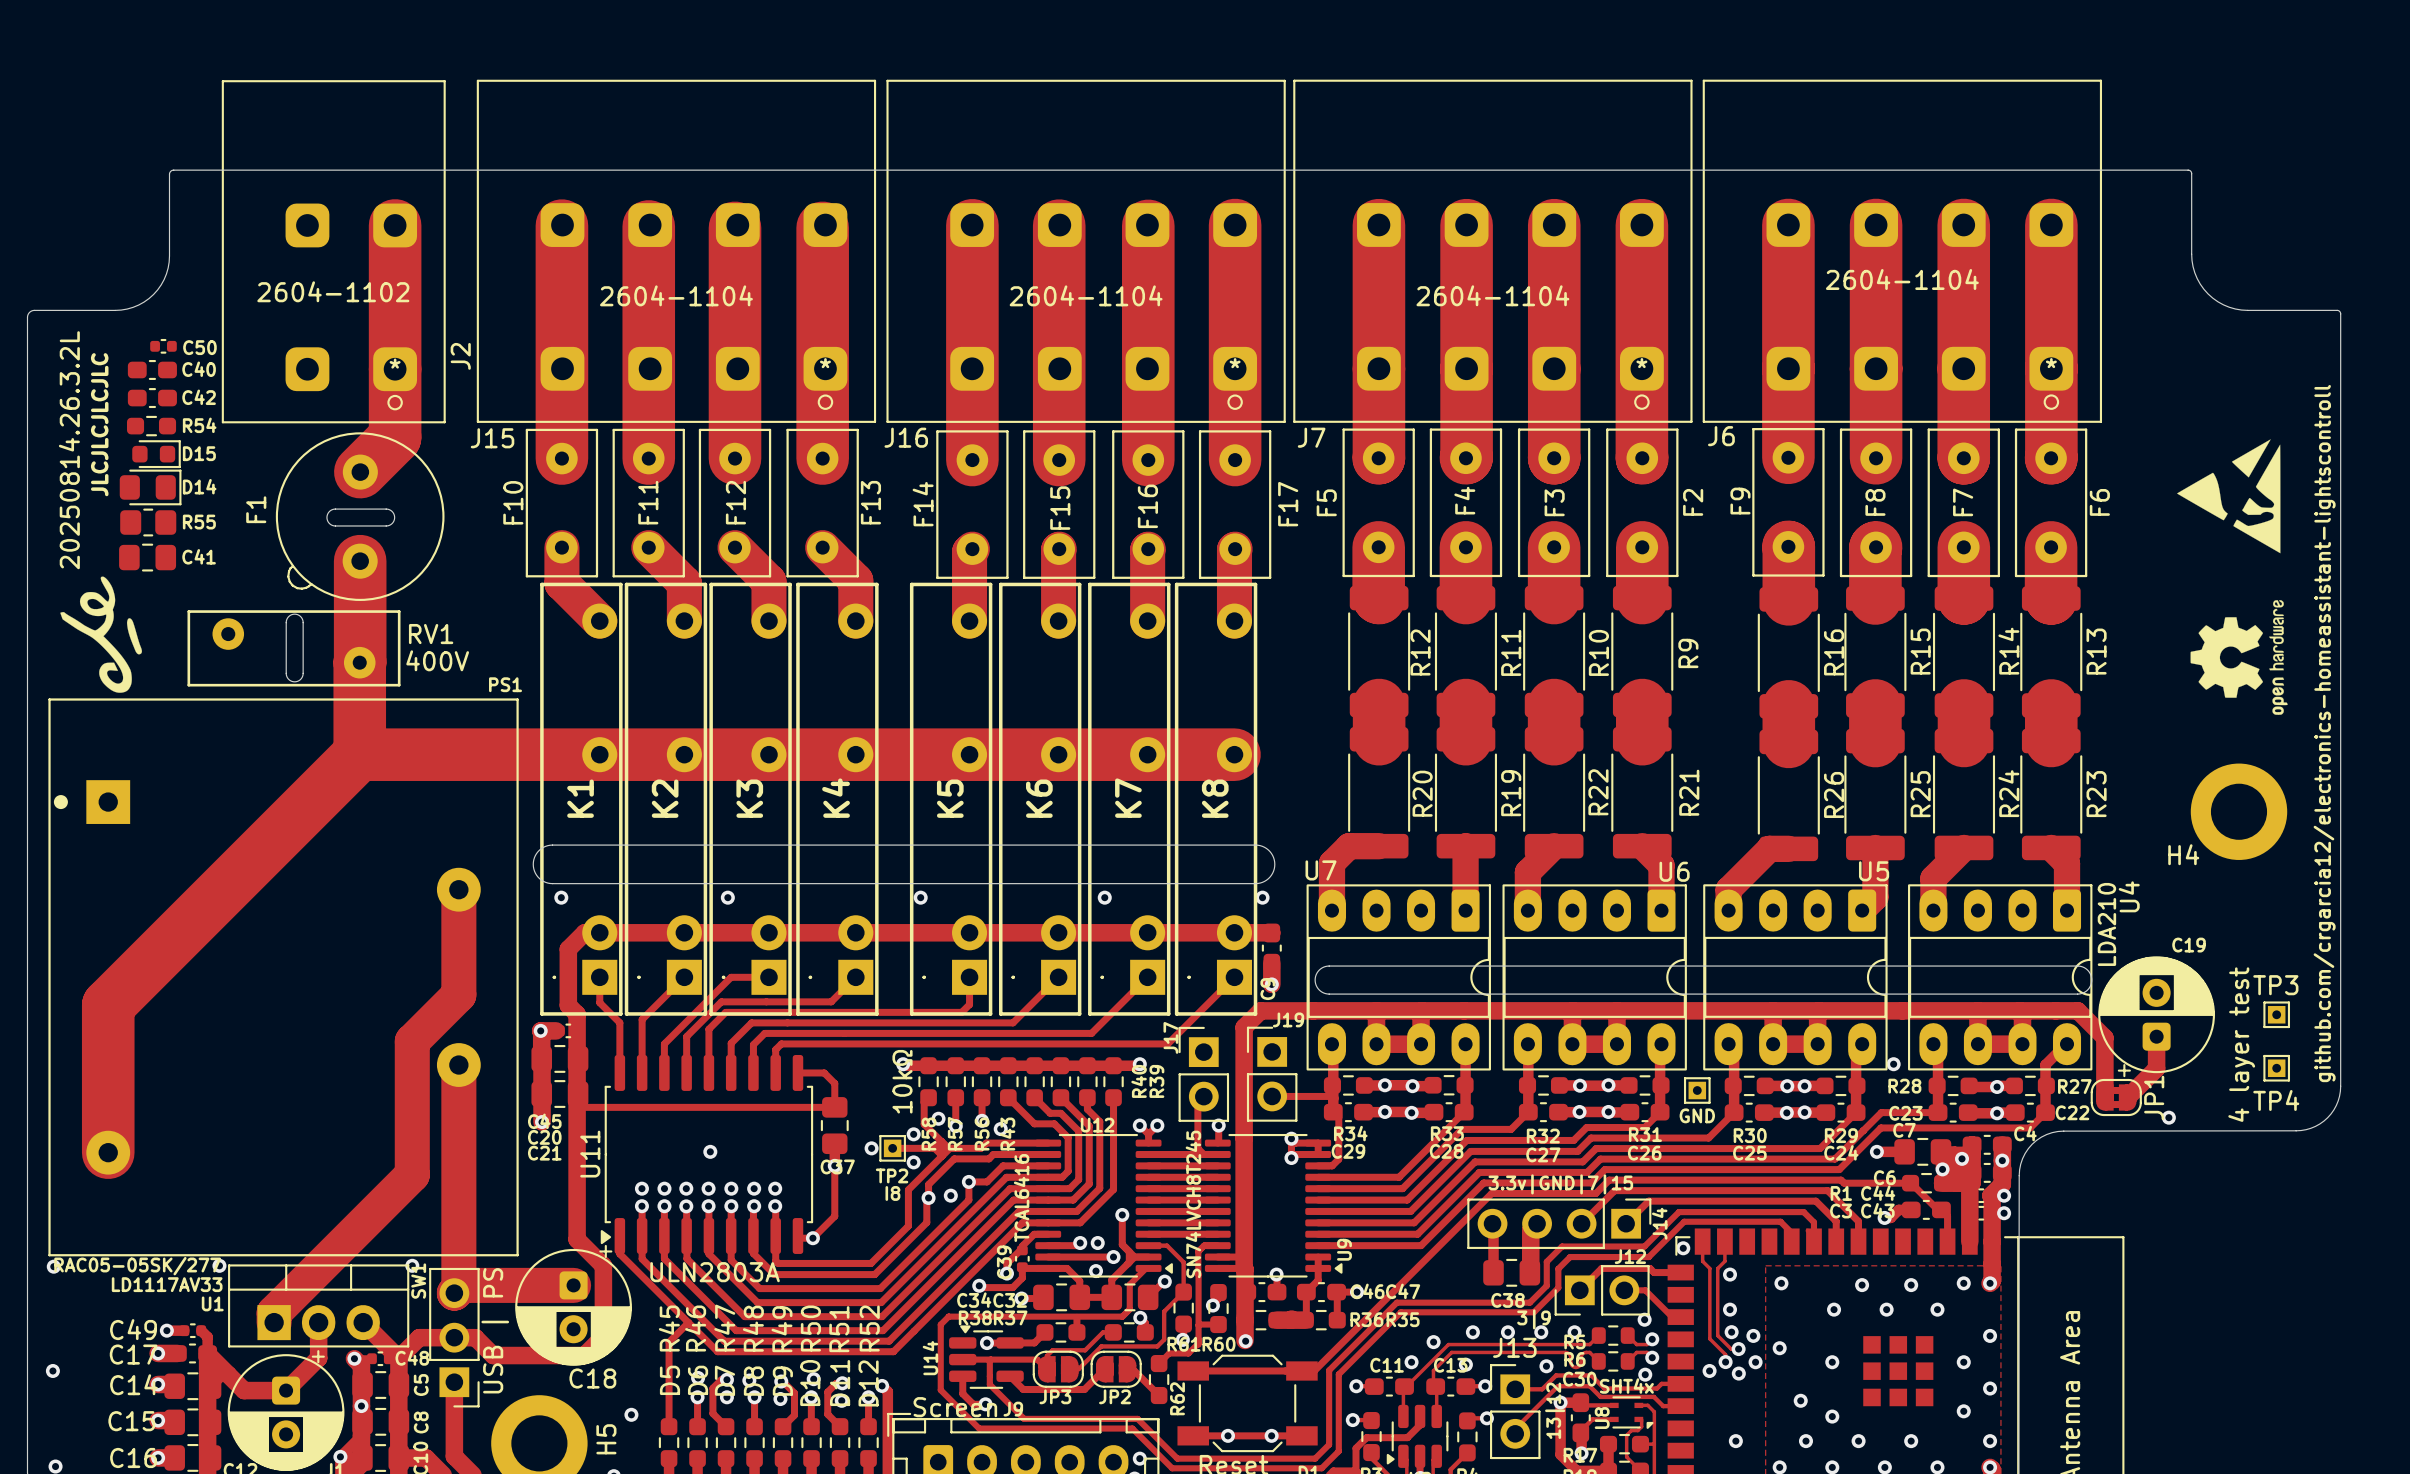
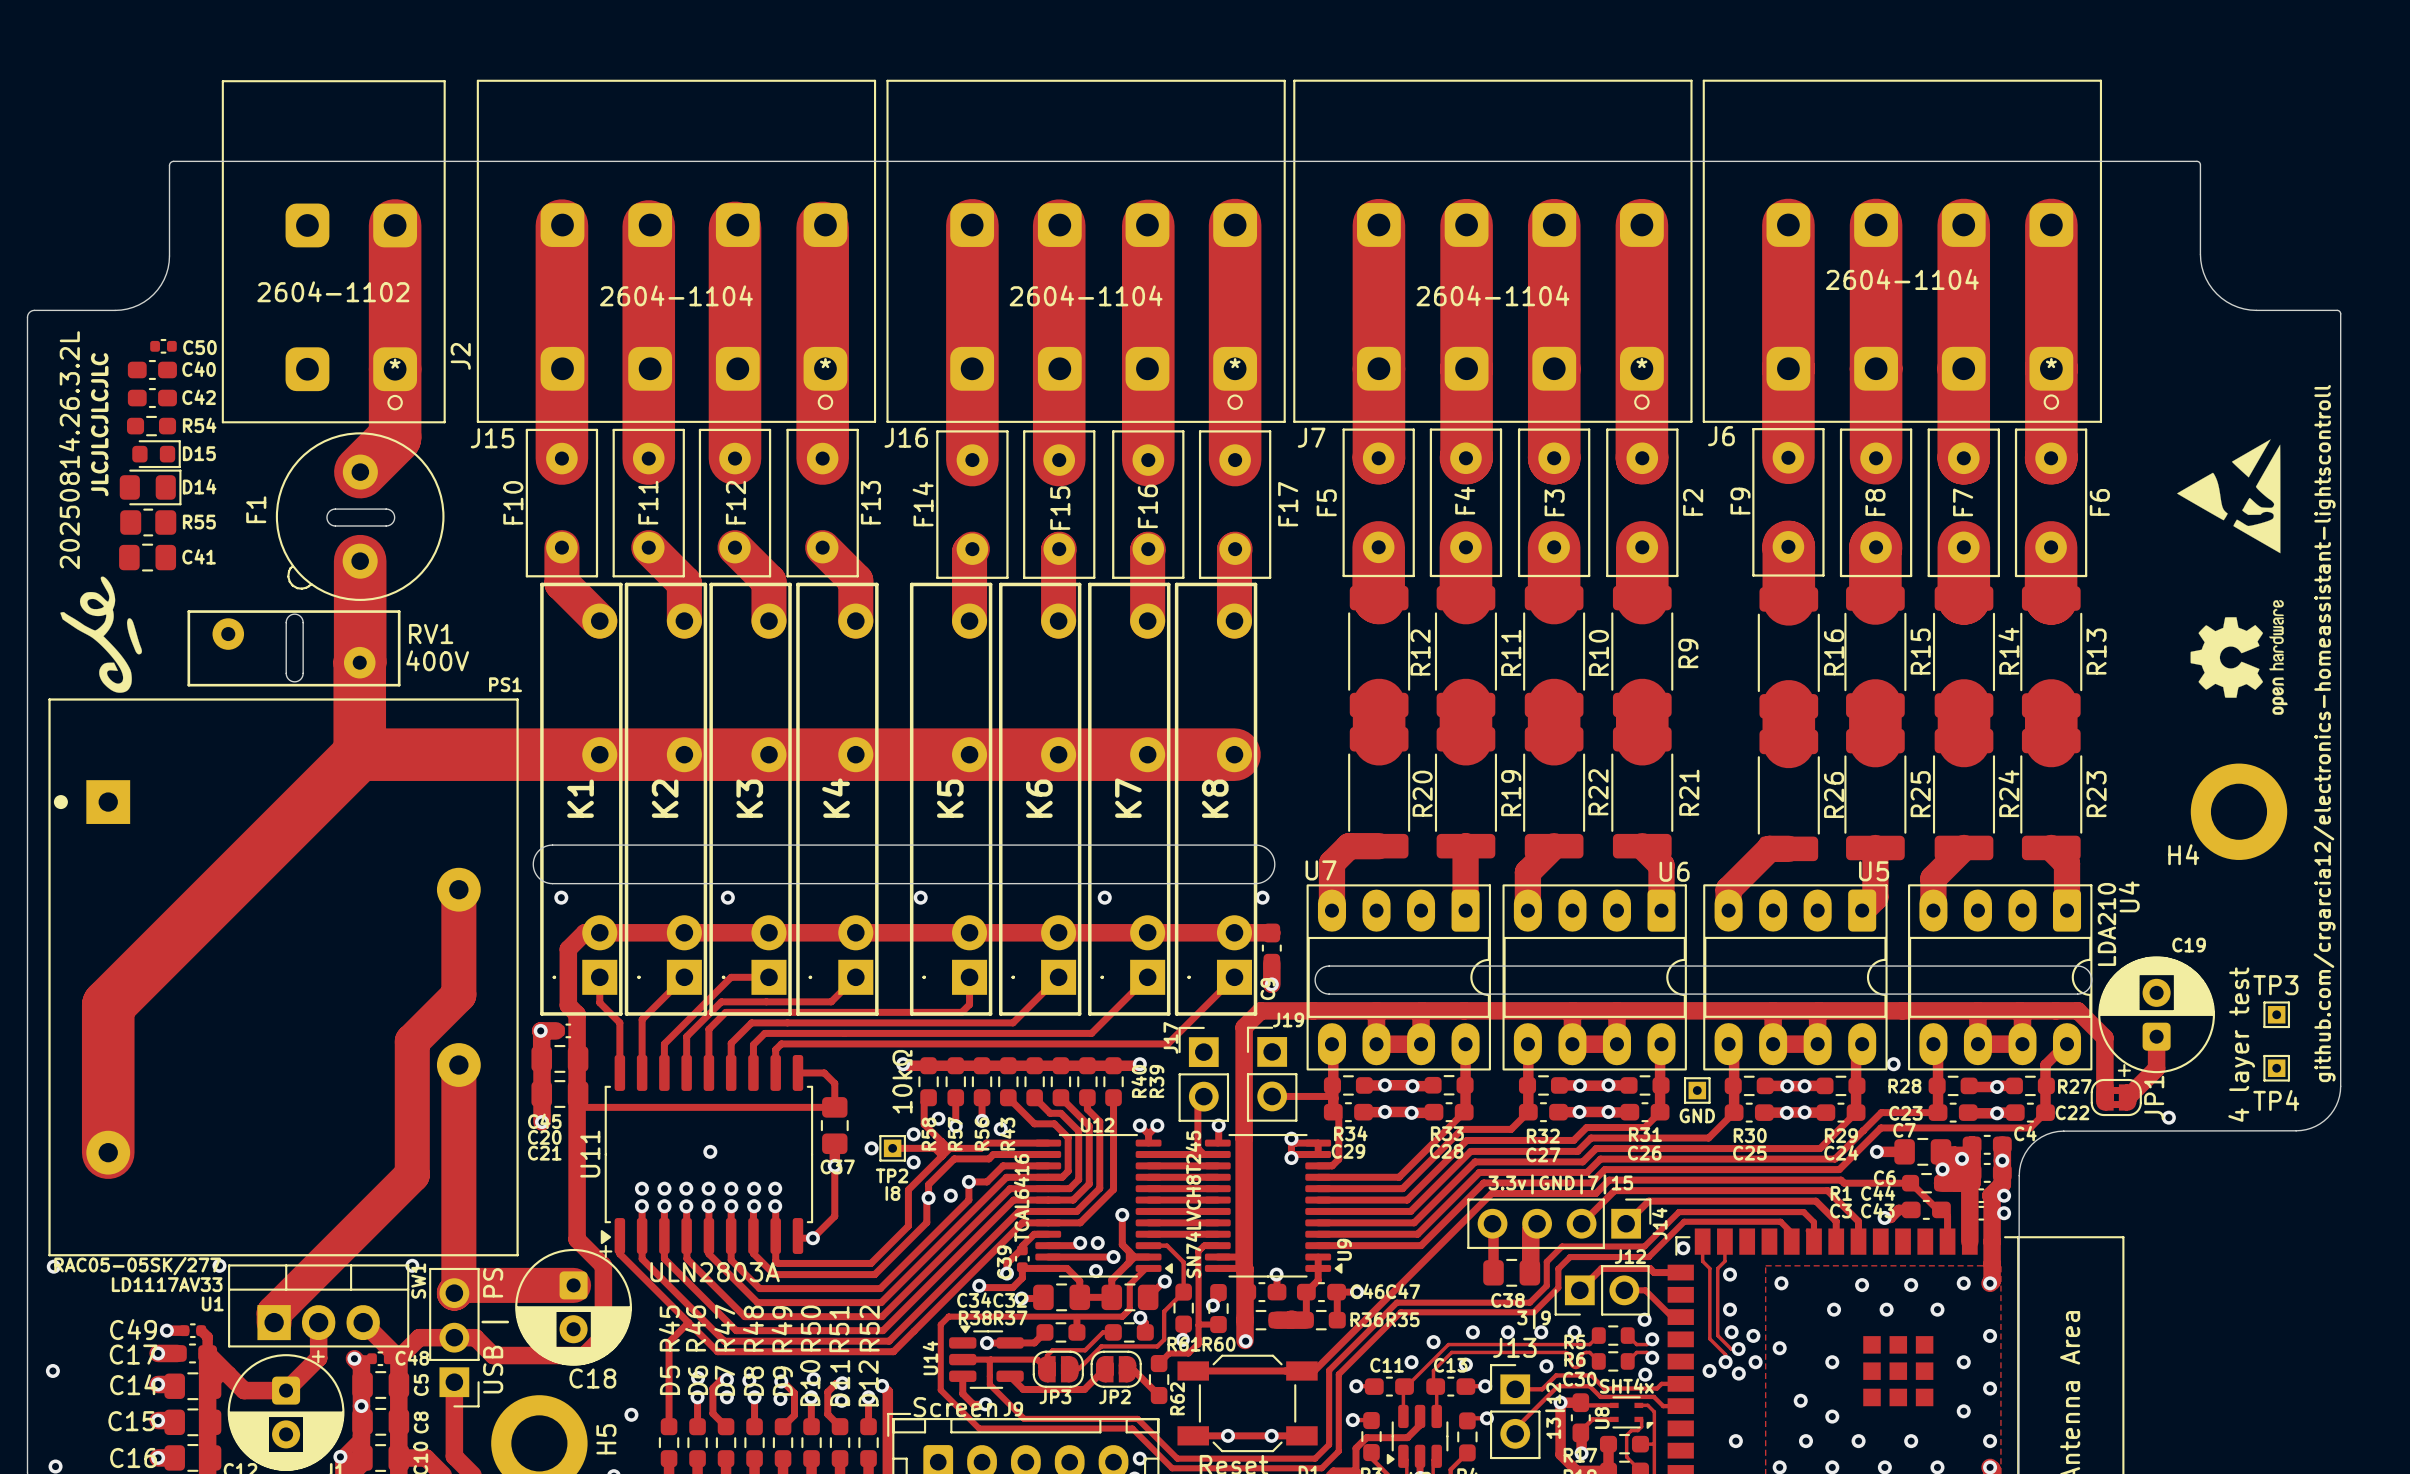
board edge: (169, 174) (173, 170) (2188, 170) (2191, 173) (2192, 260) (2197, 278) (2208, 293) (2223, 304) (2241, 310) (2256, 310) -> (169, 174) (169, 164) (173, 161) (2196, 161) (2200, 164) (2200, 254) (2203, 272) (2212, 289) (2221, 298) (2238, 307) (2256, 310)

